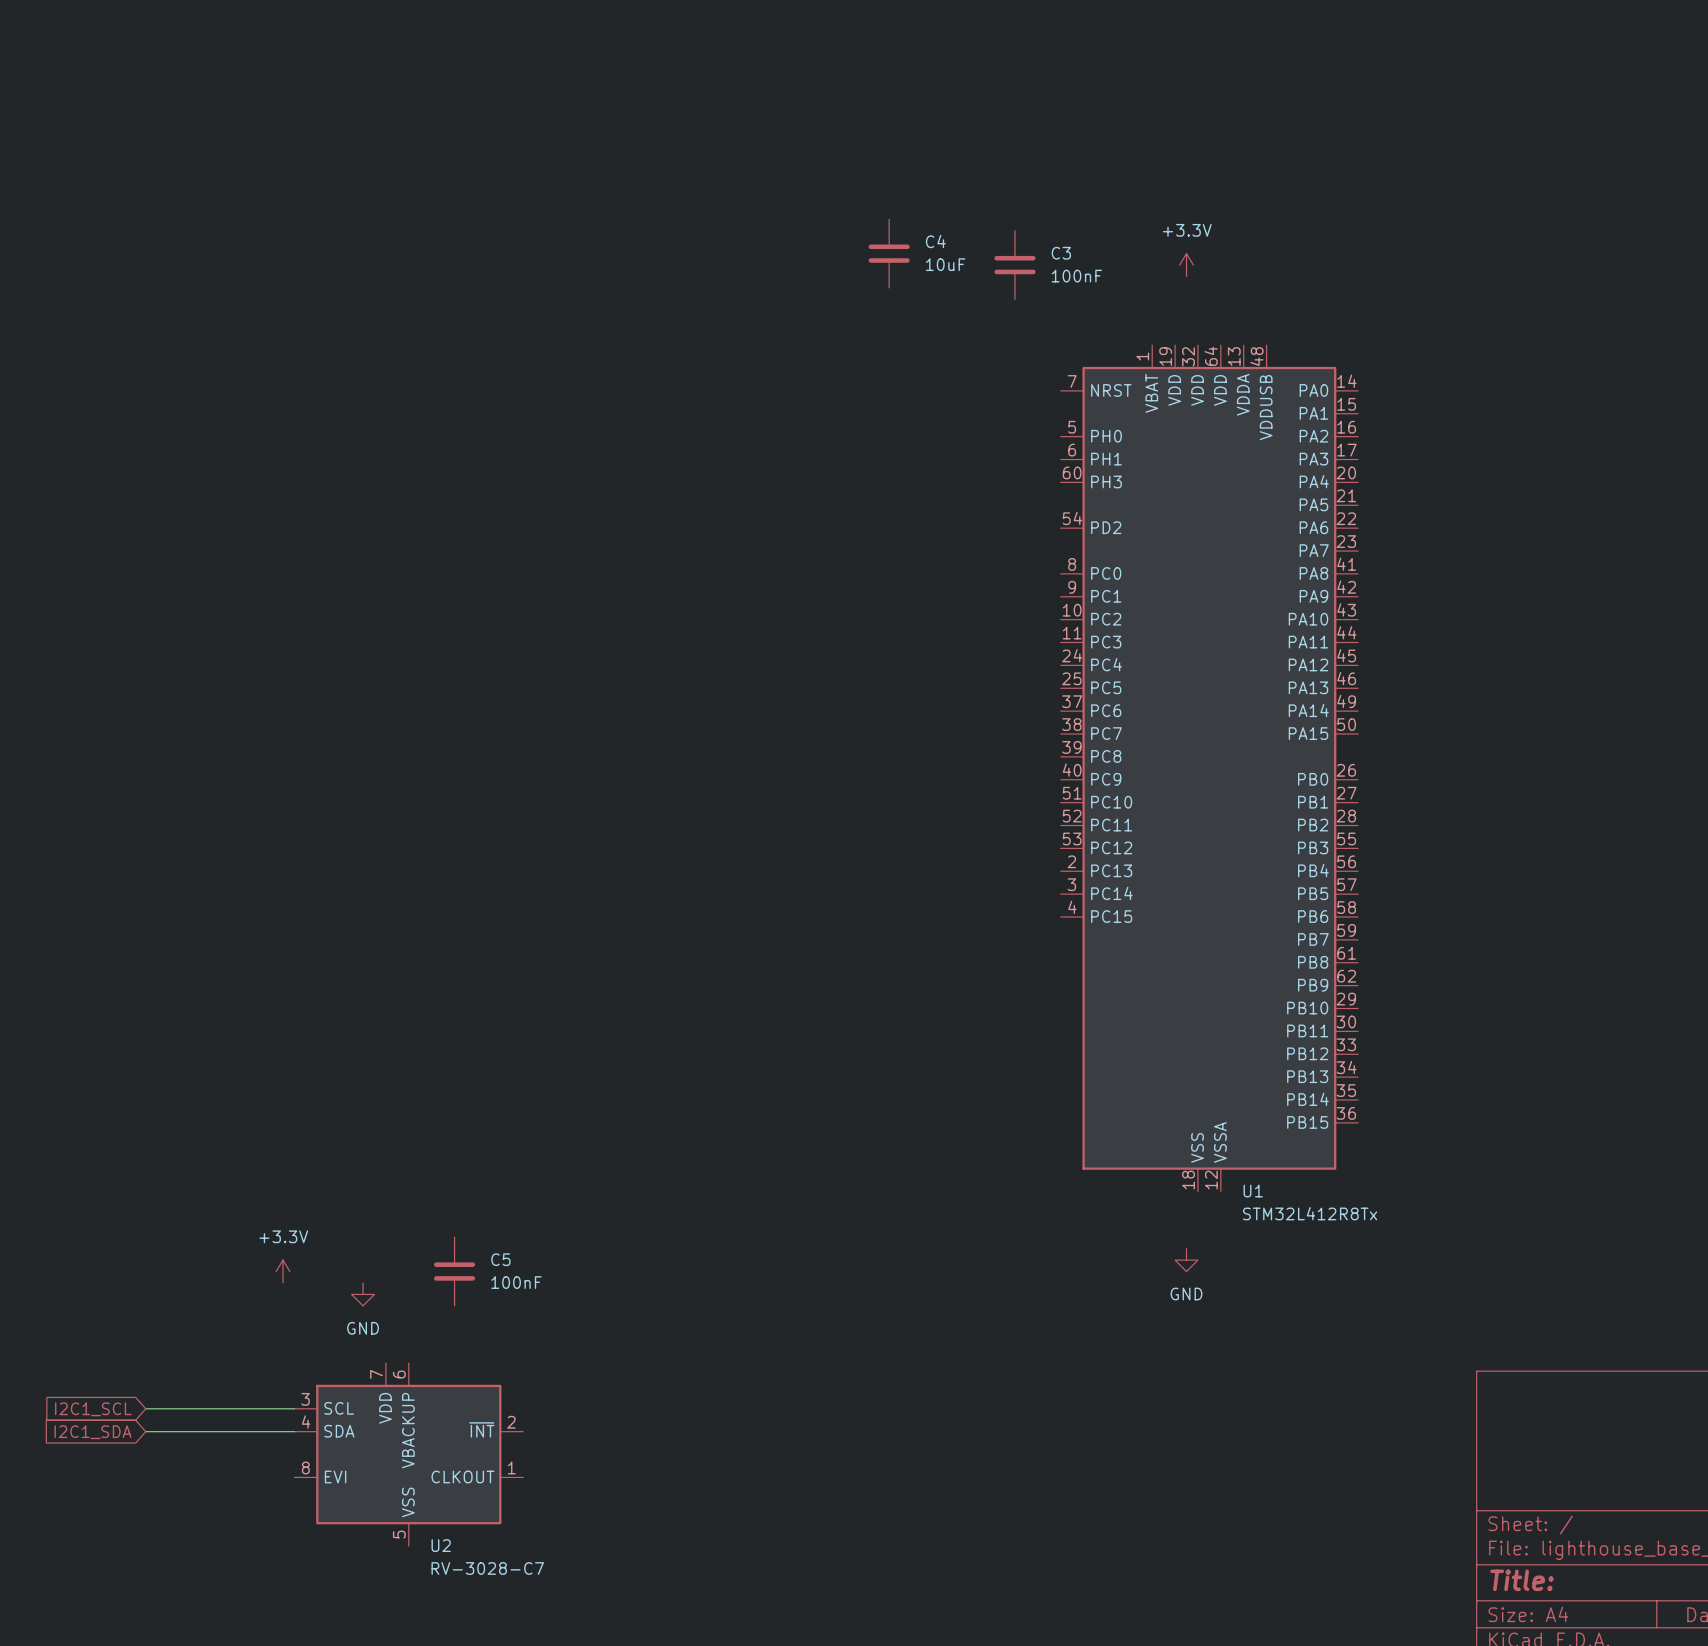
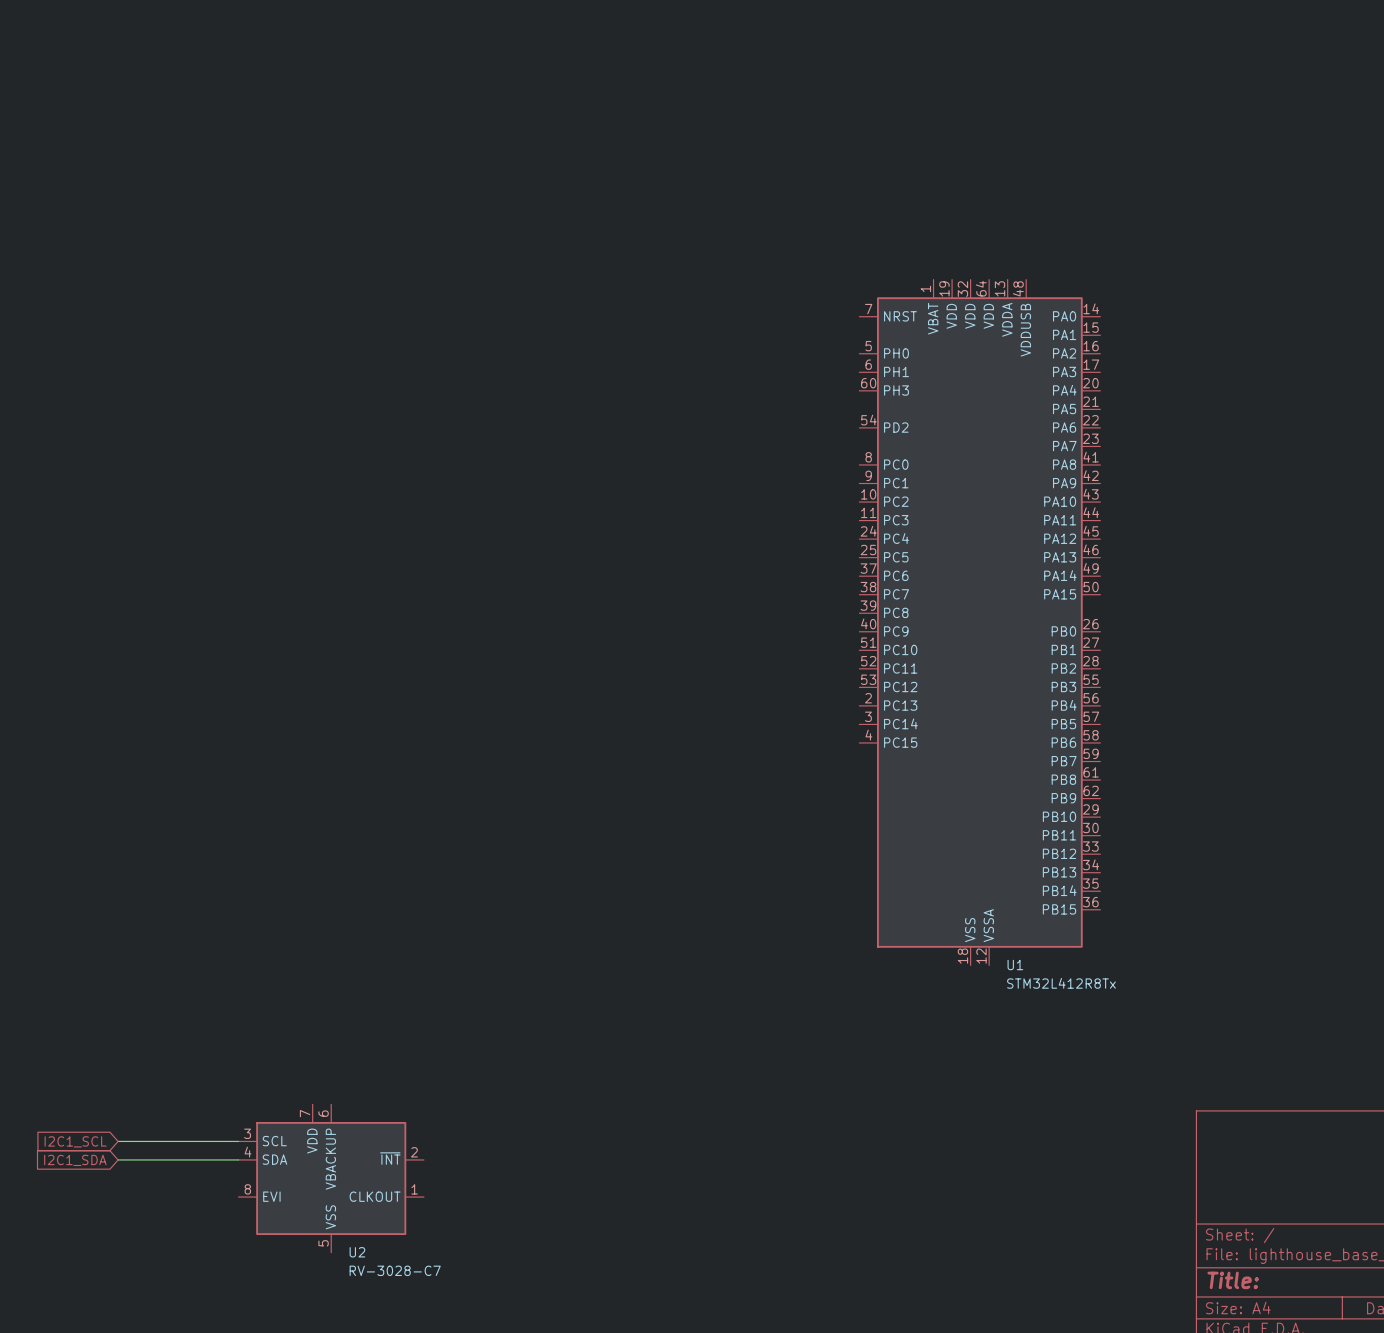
C4: 10uF (889, 253) -> none
C3: 100nF (1014, 265) -> none
power symbol: +3.3V (1186, 265) -> none
power symbol: GND (1186, 1260) -> none
power symbol: +3.3V (282, 1271) -> none
C5: 100nF (454, 1271) -> none
power symbol: GND (363, 1294) -> none

